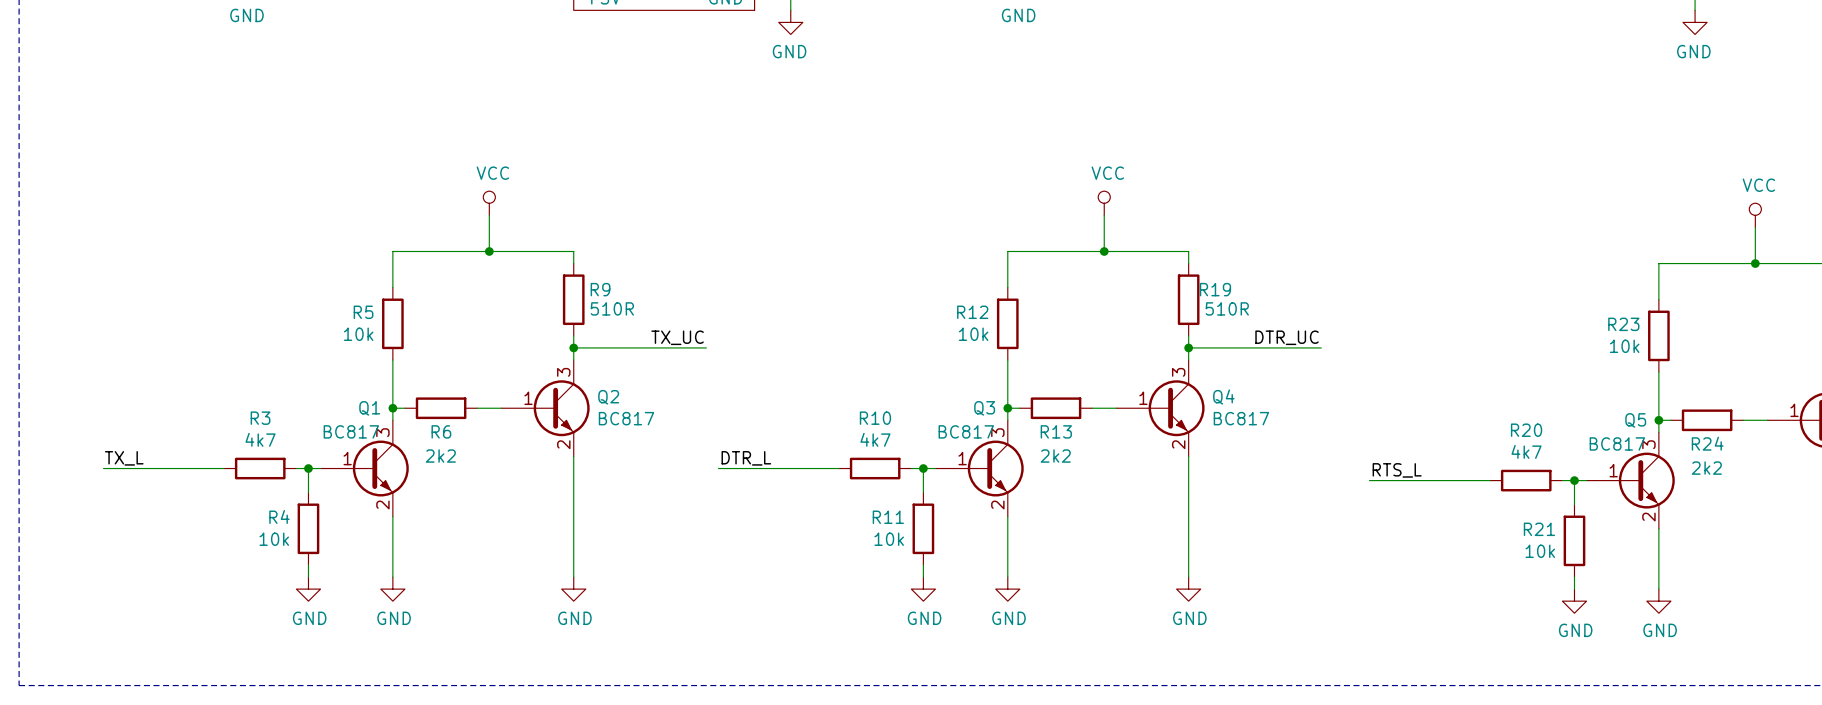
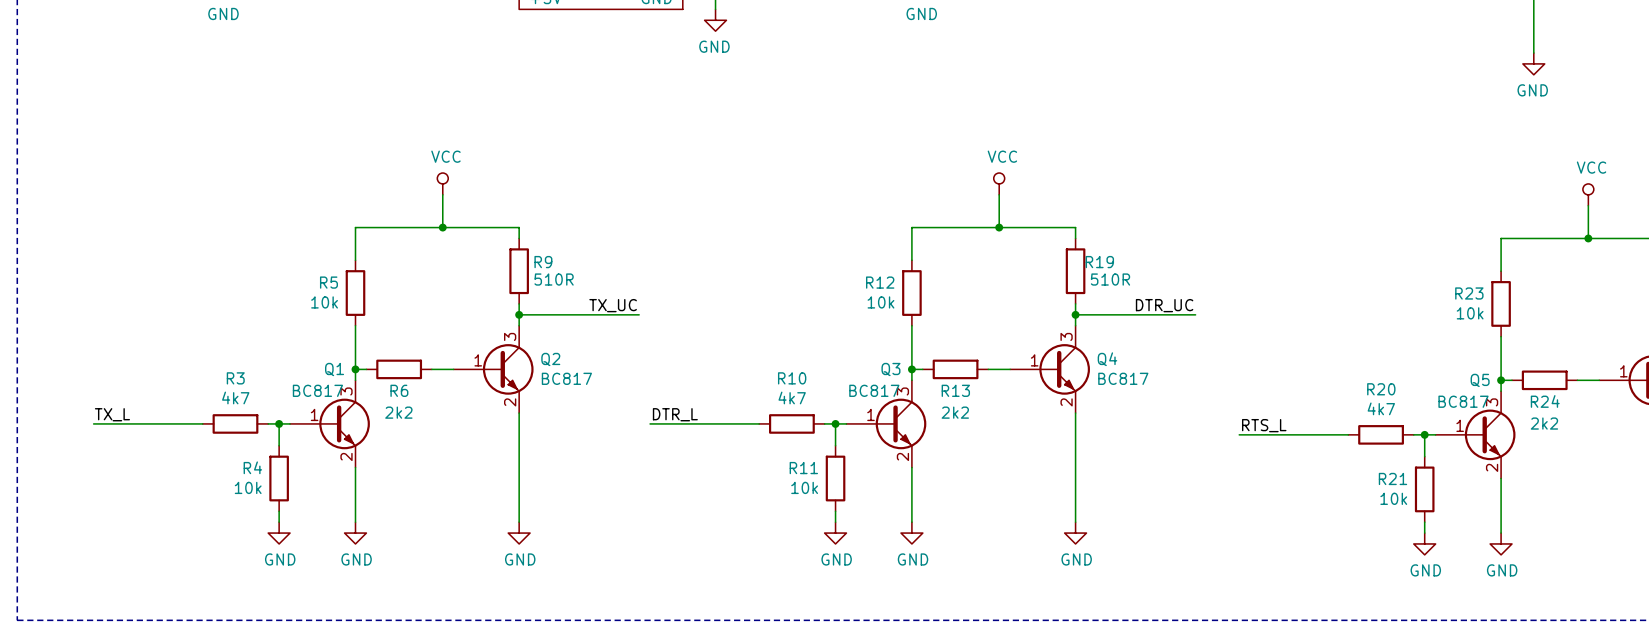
wire: none -> (1533, 9) (1533, 53)
power symbol position: GND (1695, 22) -> GND (1533, 63)

